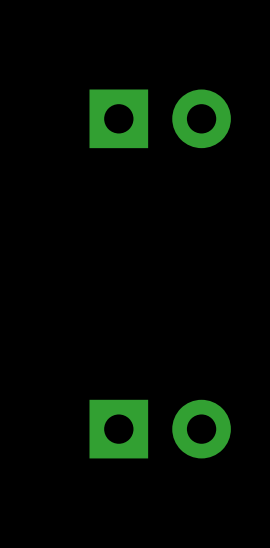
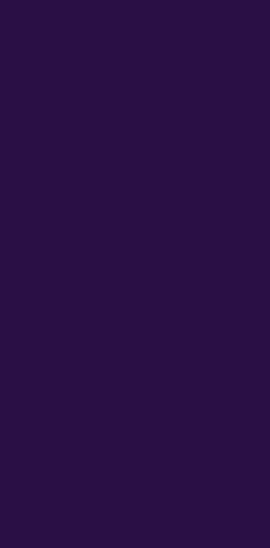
part: (160, 118) -> none
part: (160, 429) -> none

